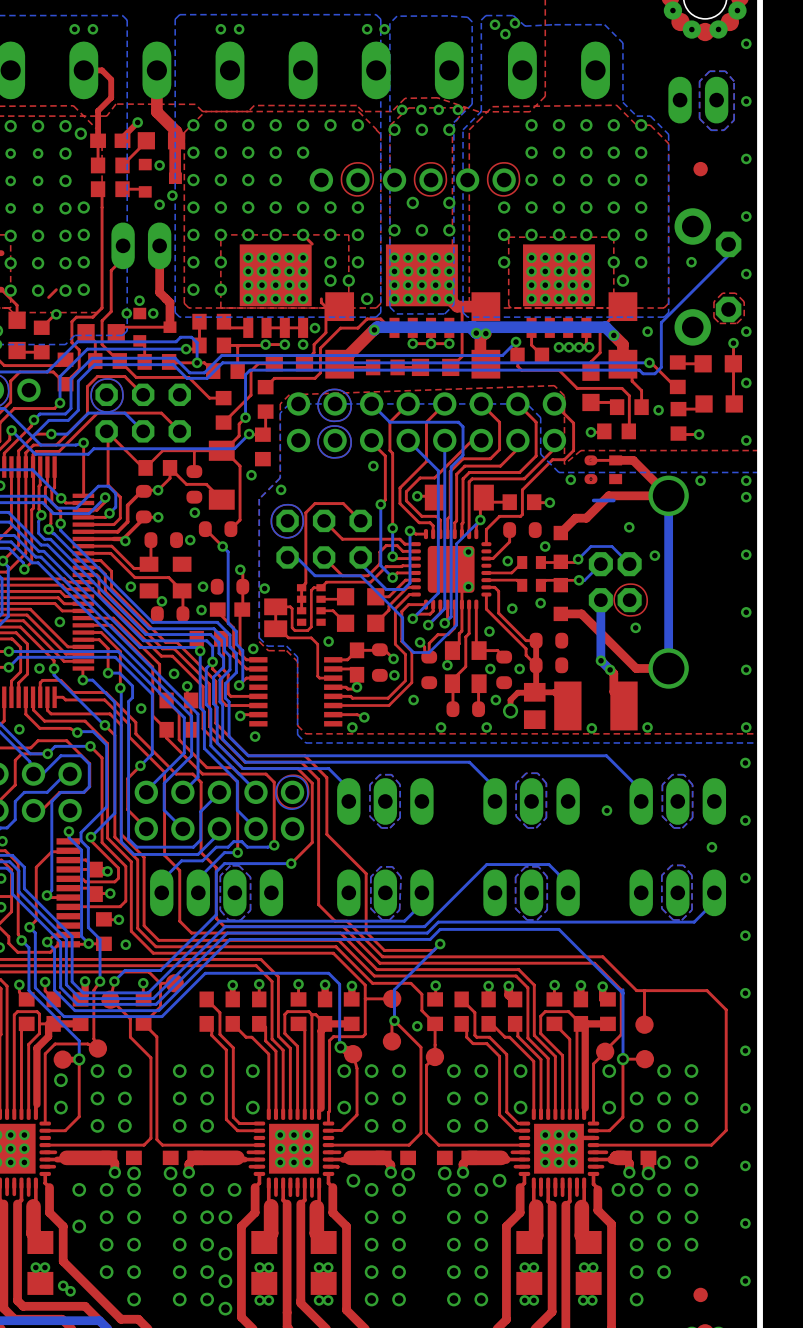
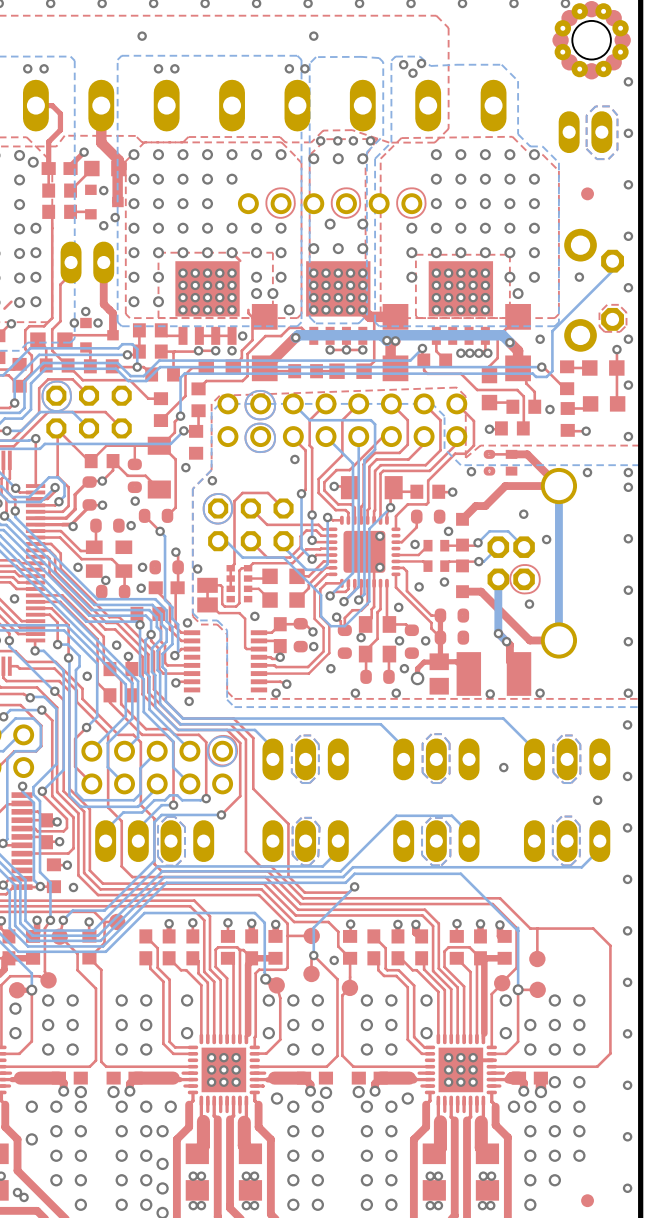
bottom track: (613, 500) (593, 500) -> none

